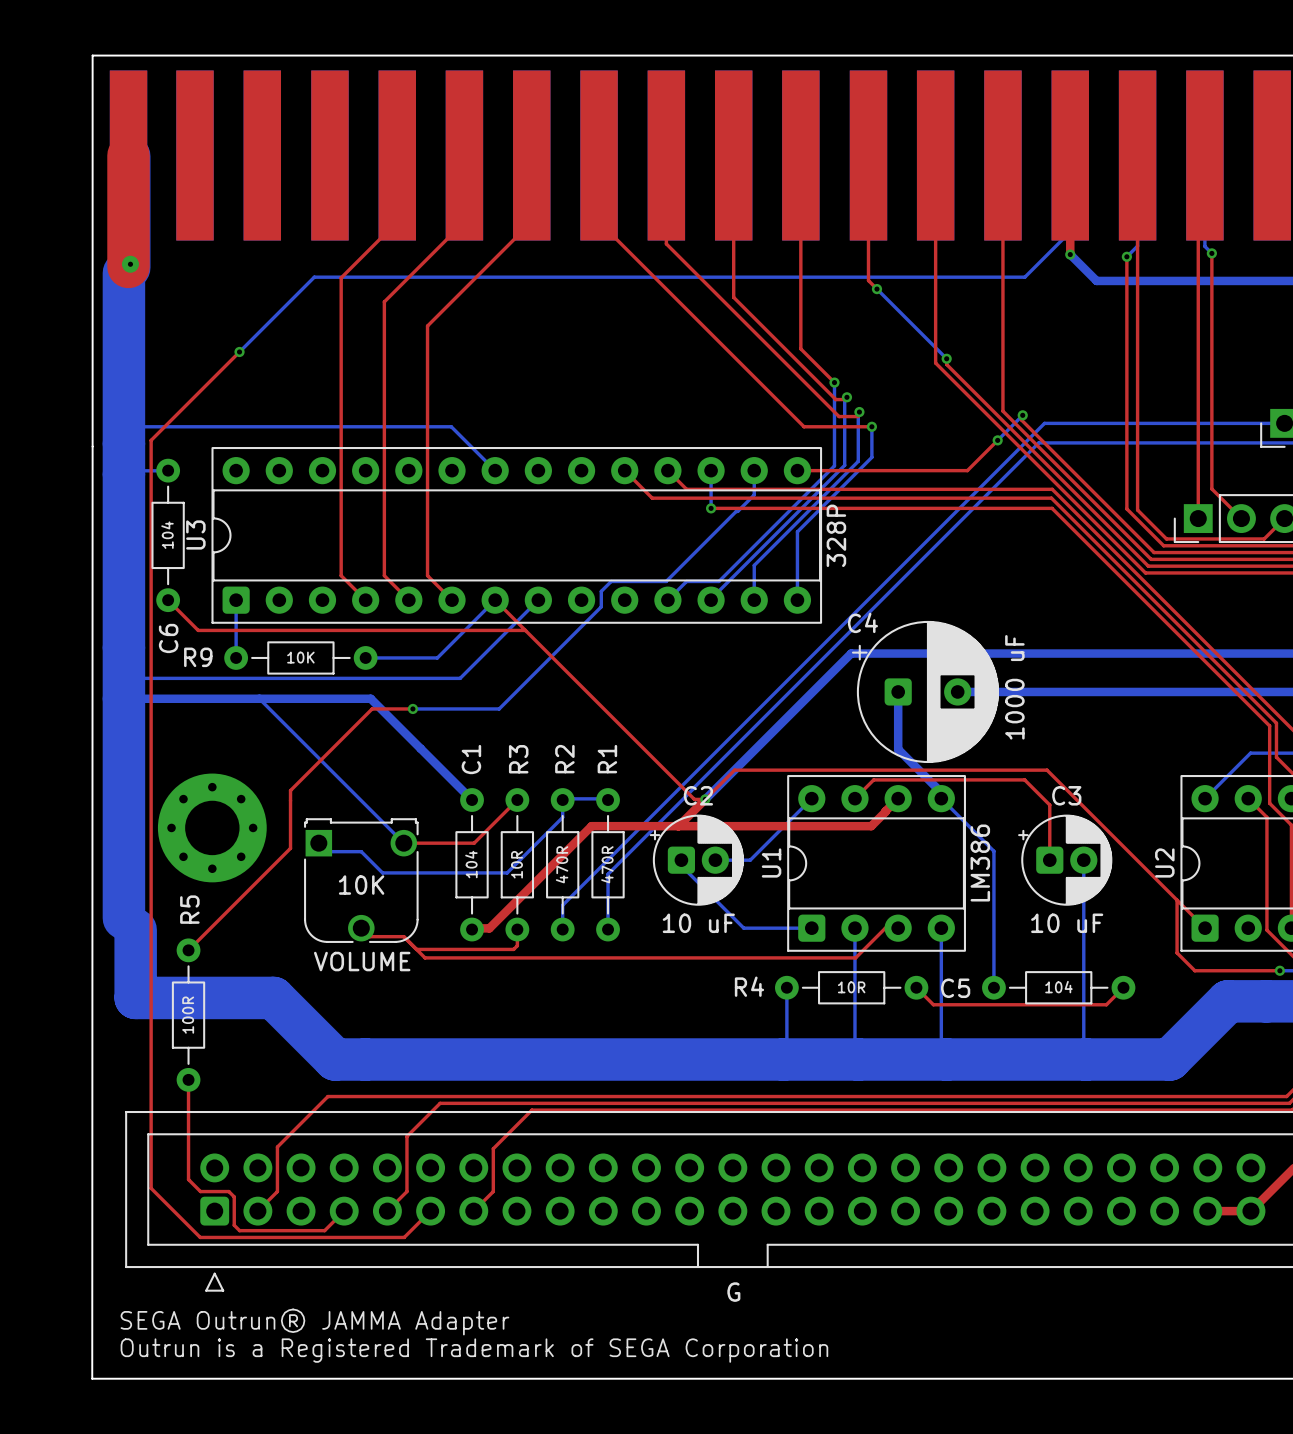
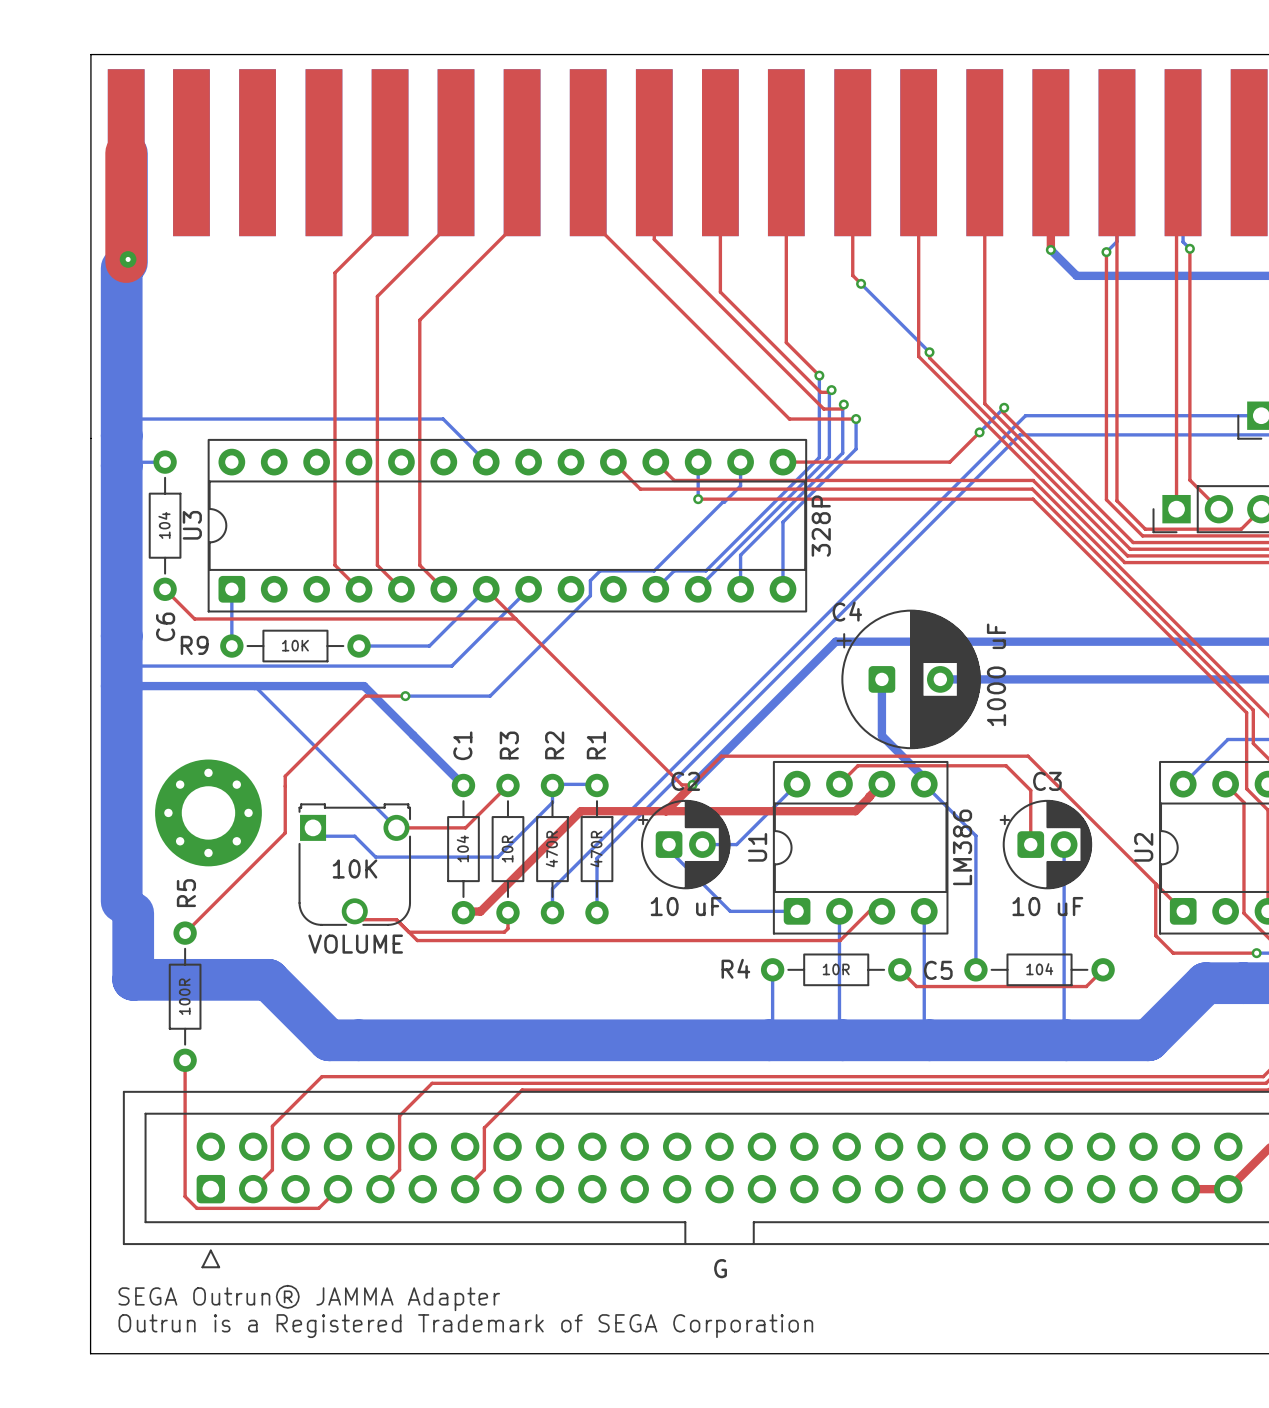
bottom track: (1070, 155) (1070, 231) (1024, 277) (314, 277) (239, 351) -> none
top track: (239, 351) (151, 440) (151, 1188) (200, 1237) (404, 1237) (430, 1211) -> none
via: (239, 351) -> none
top track: (188, 1179) (200, 1191) (228, 1191) (234, 1196) (234, 1225) (239, 1230) -> (185, 1158) (185, 1196) (196, 1208) (235, 1208)

